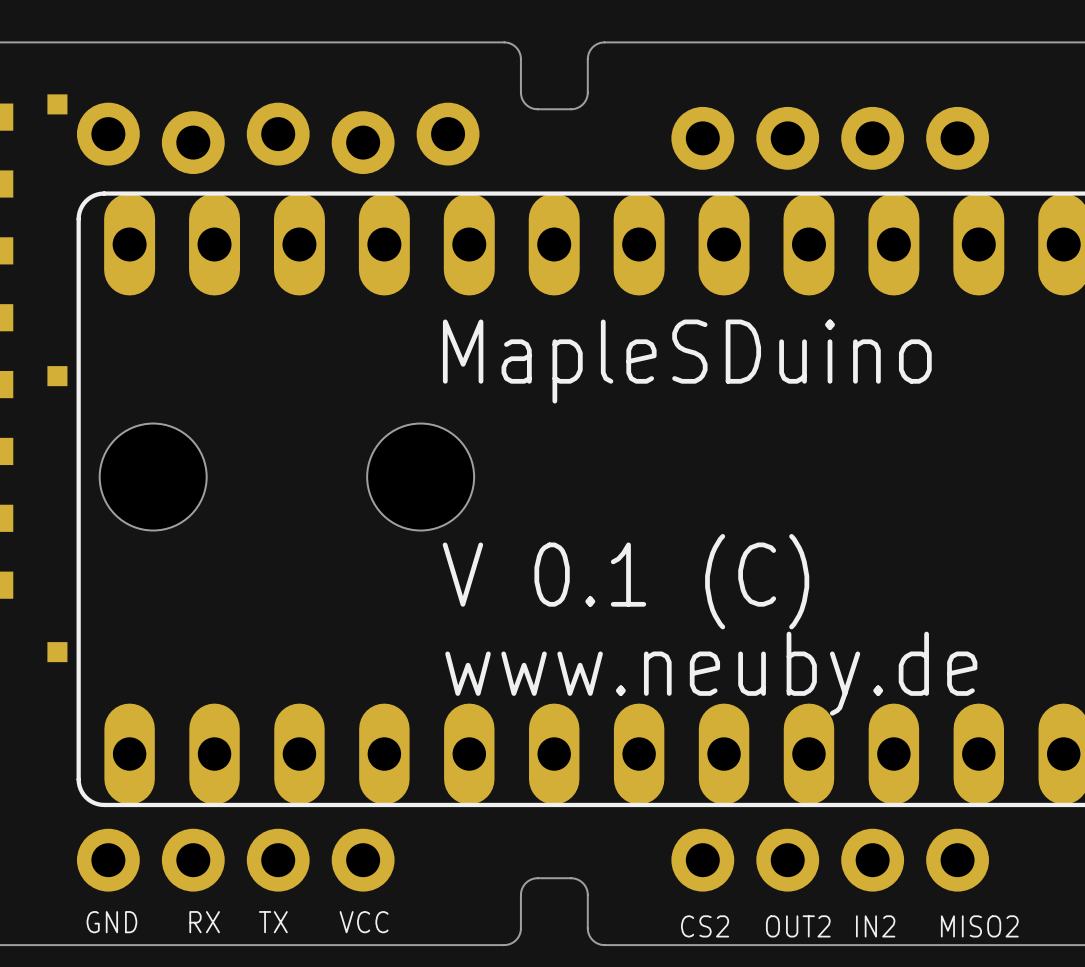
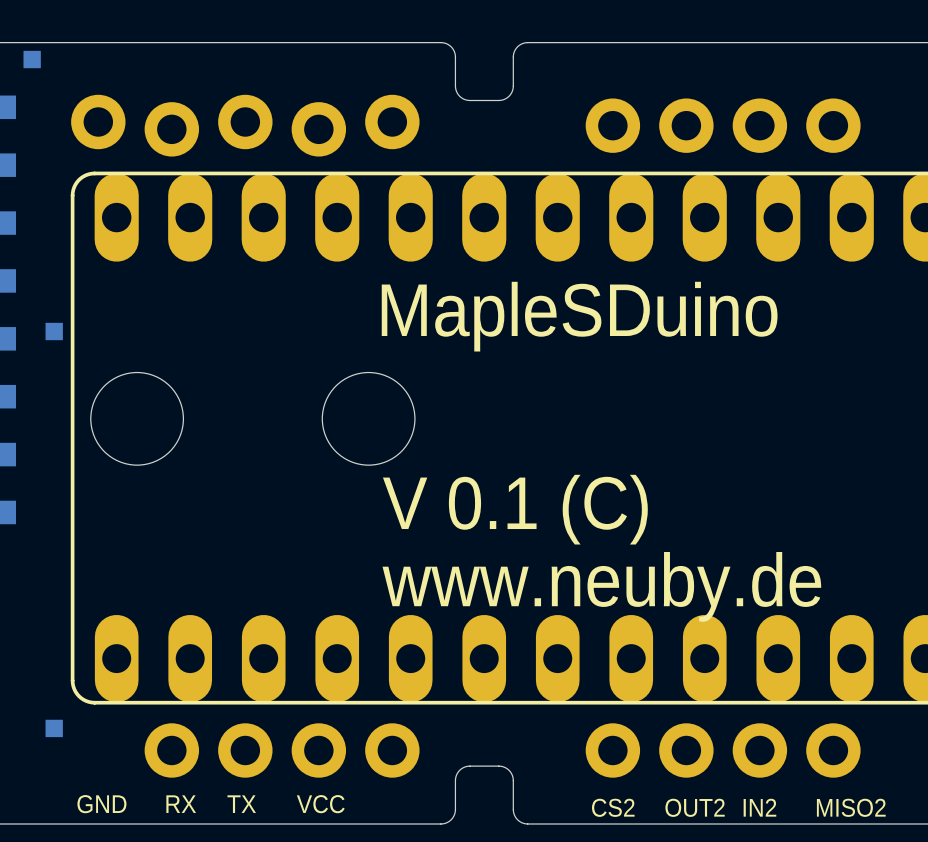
part position: (57, 104) -> (32, 59)
part position: (57, 652) -> (54, 728)
part position: (235, 860) -> (282, 750)

